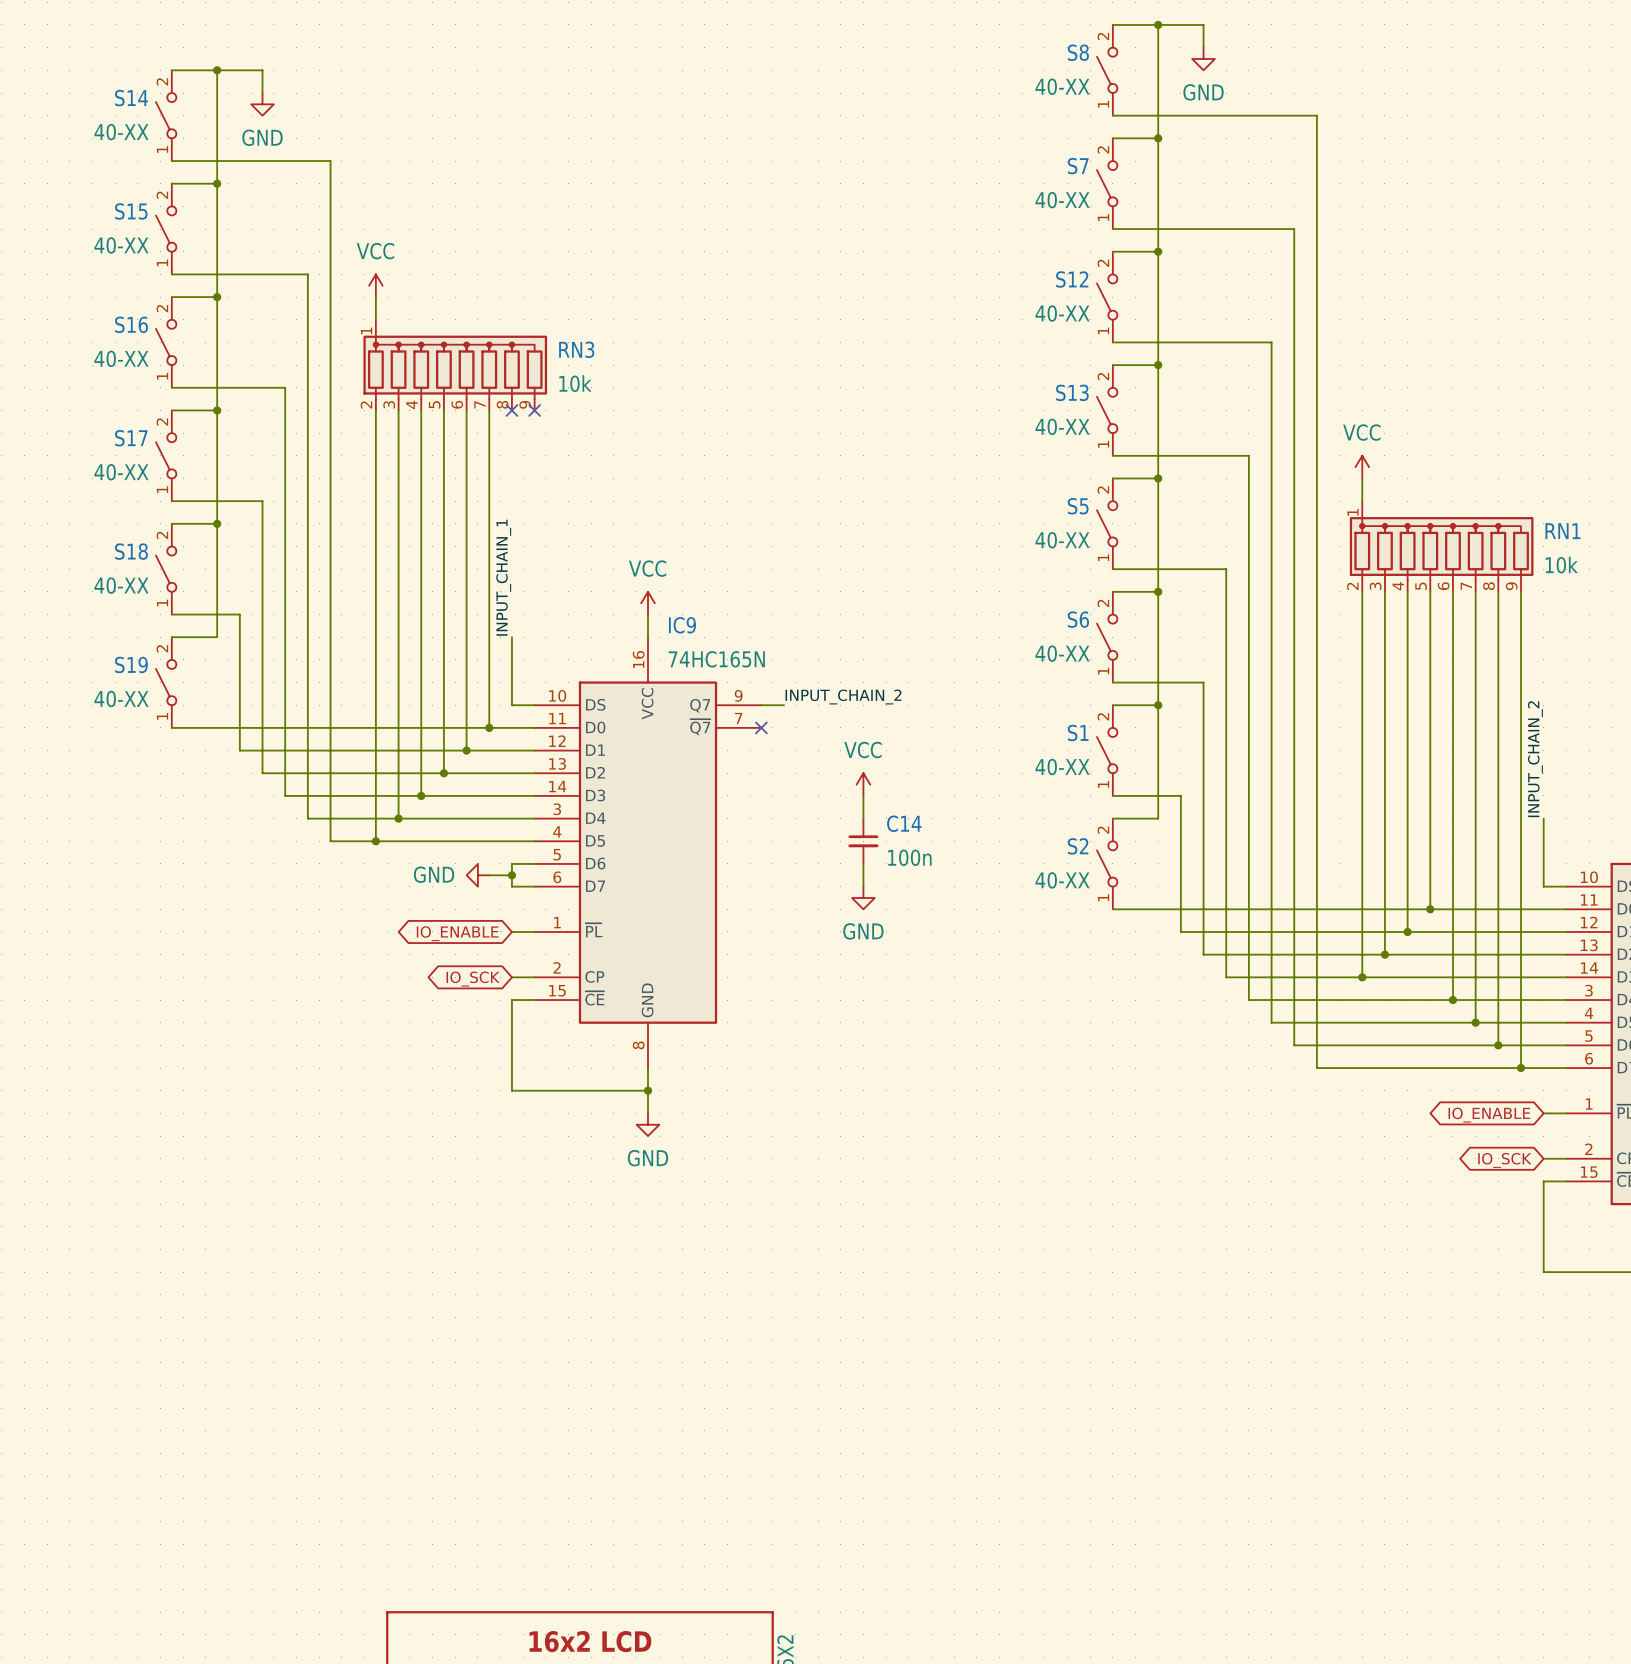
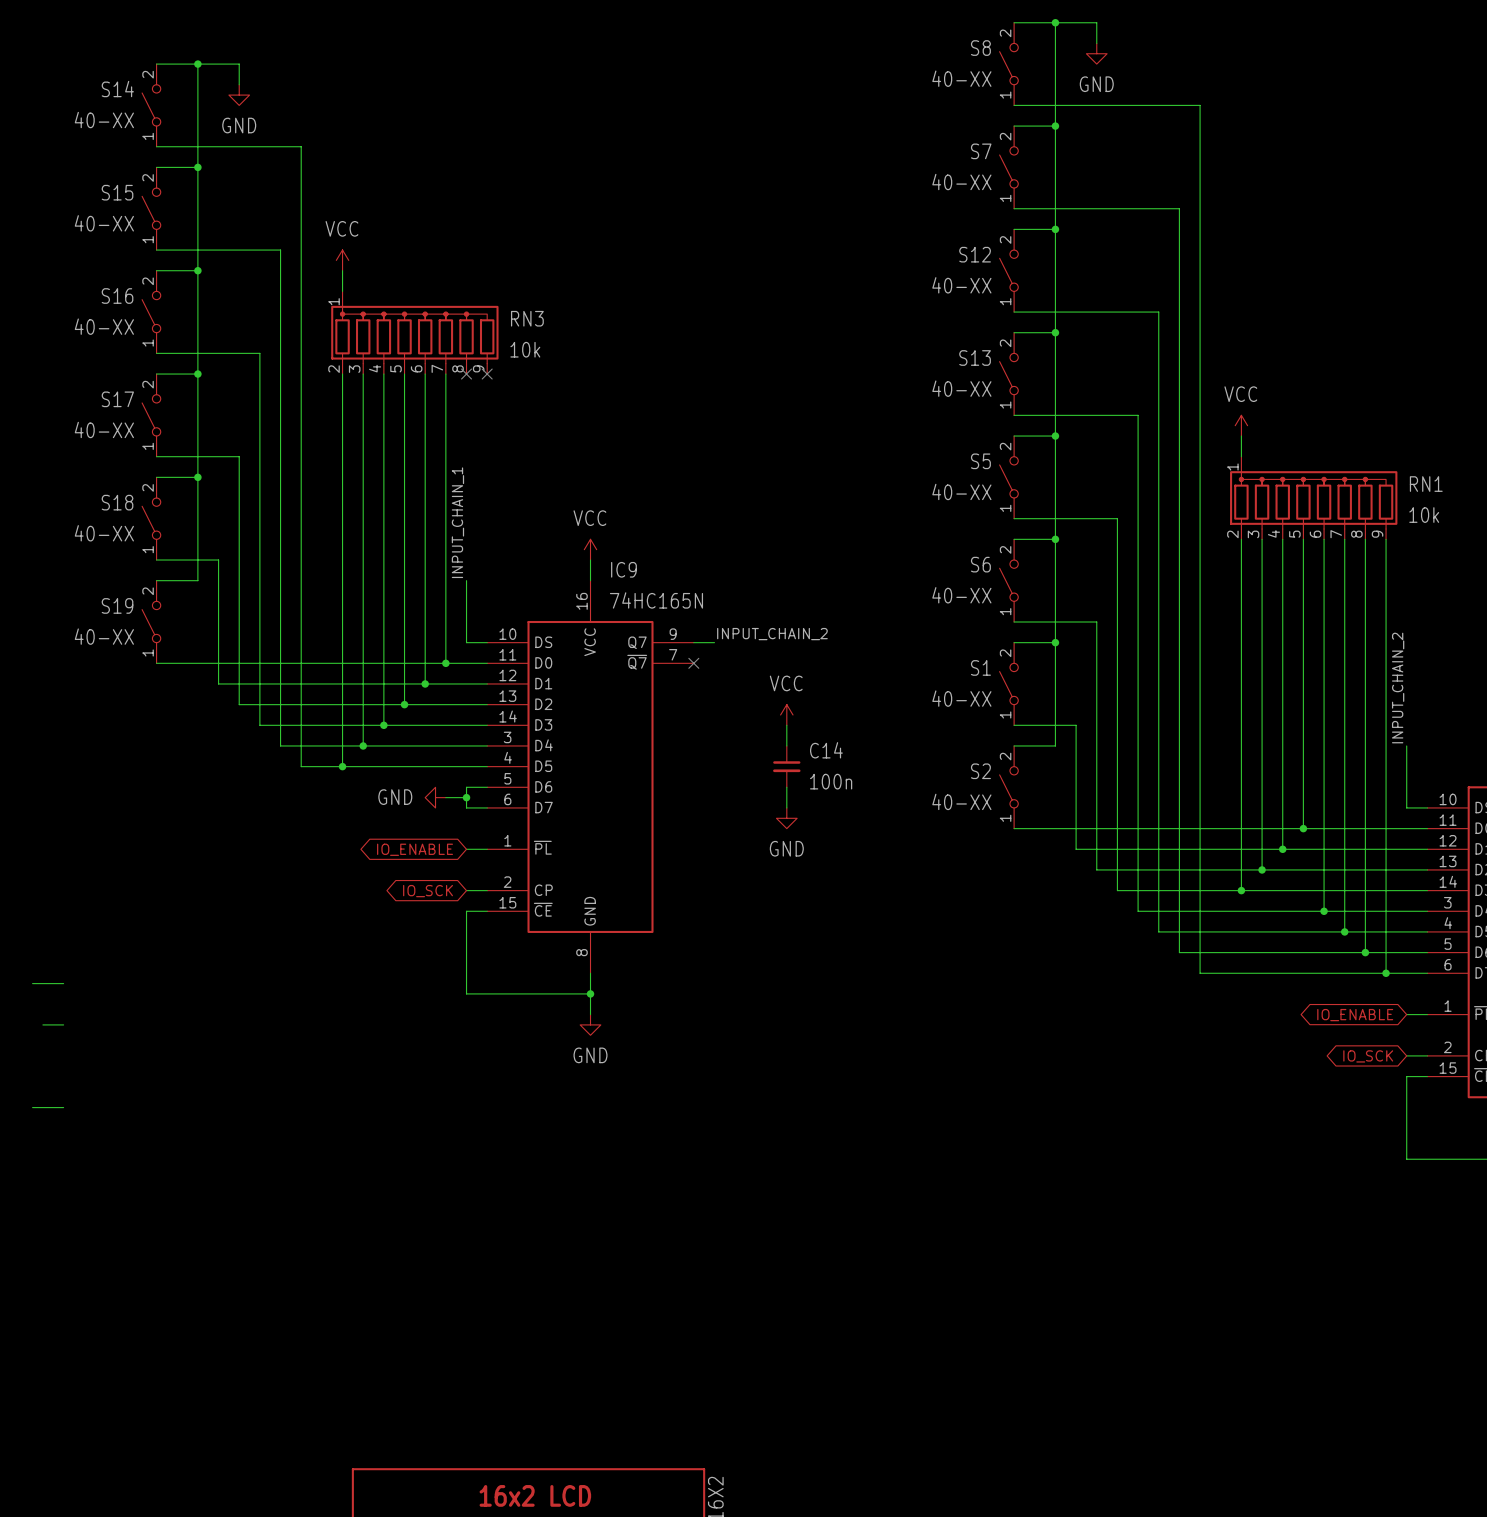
wire: none -> (32, 983) (63, 983)
wire: none -> (42, 1024) (63, 1024)
wire: none -> (32, 1107) (63, 1107)

